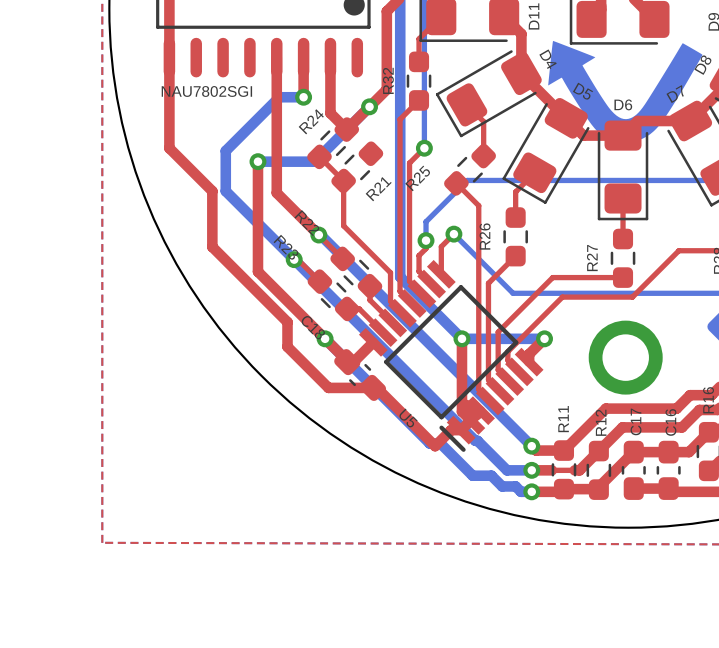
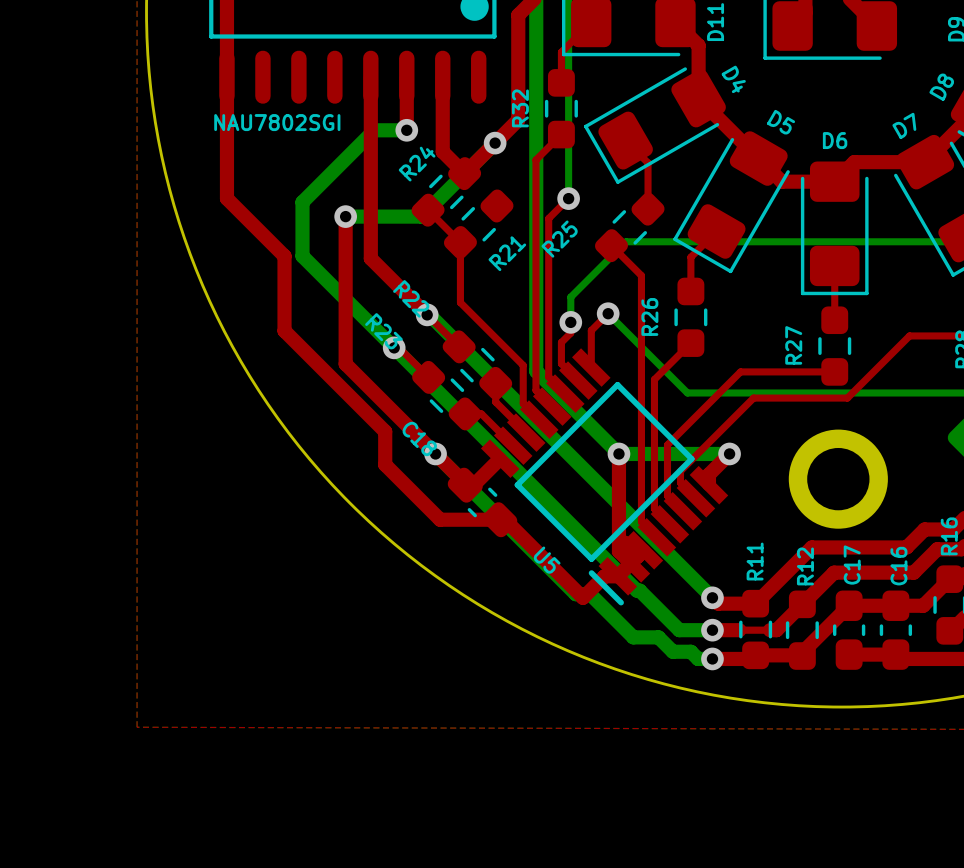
drawing: [548, 40, 703, 143] -> none

